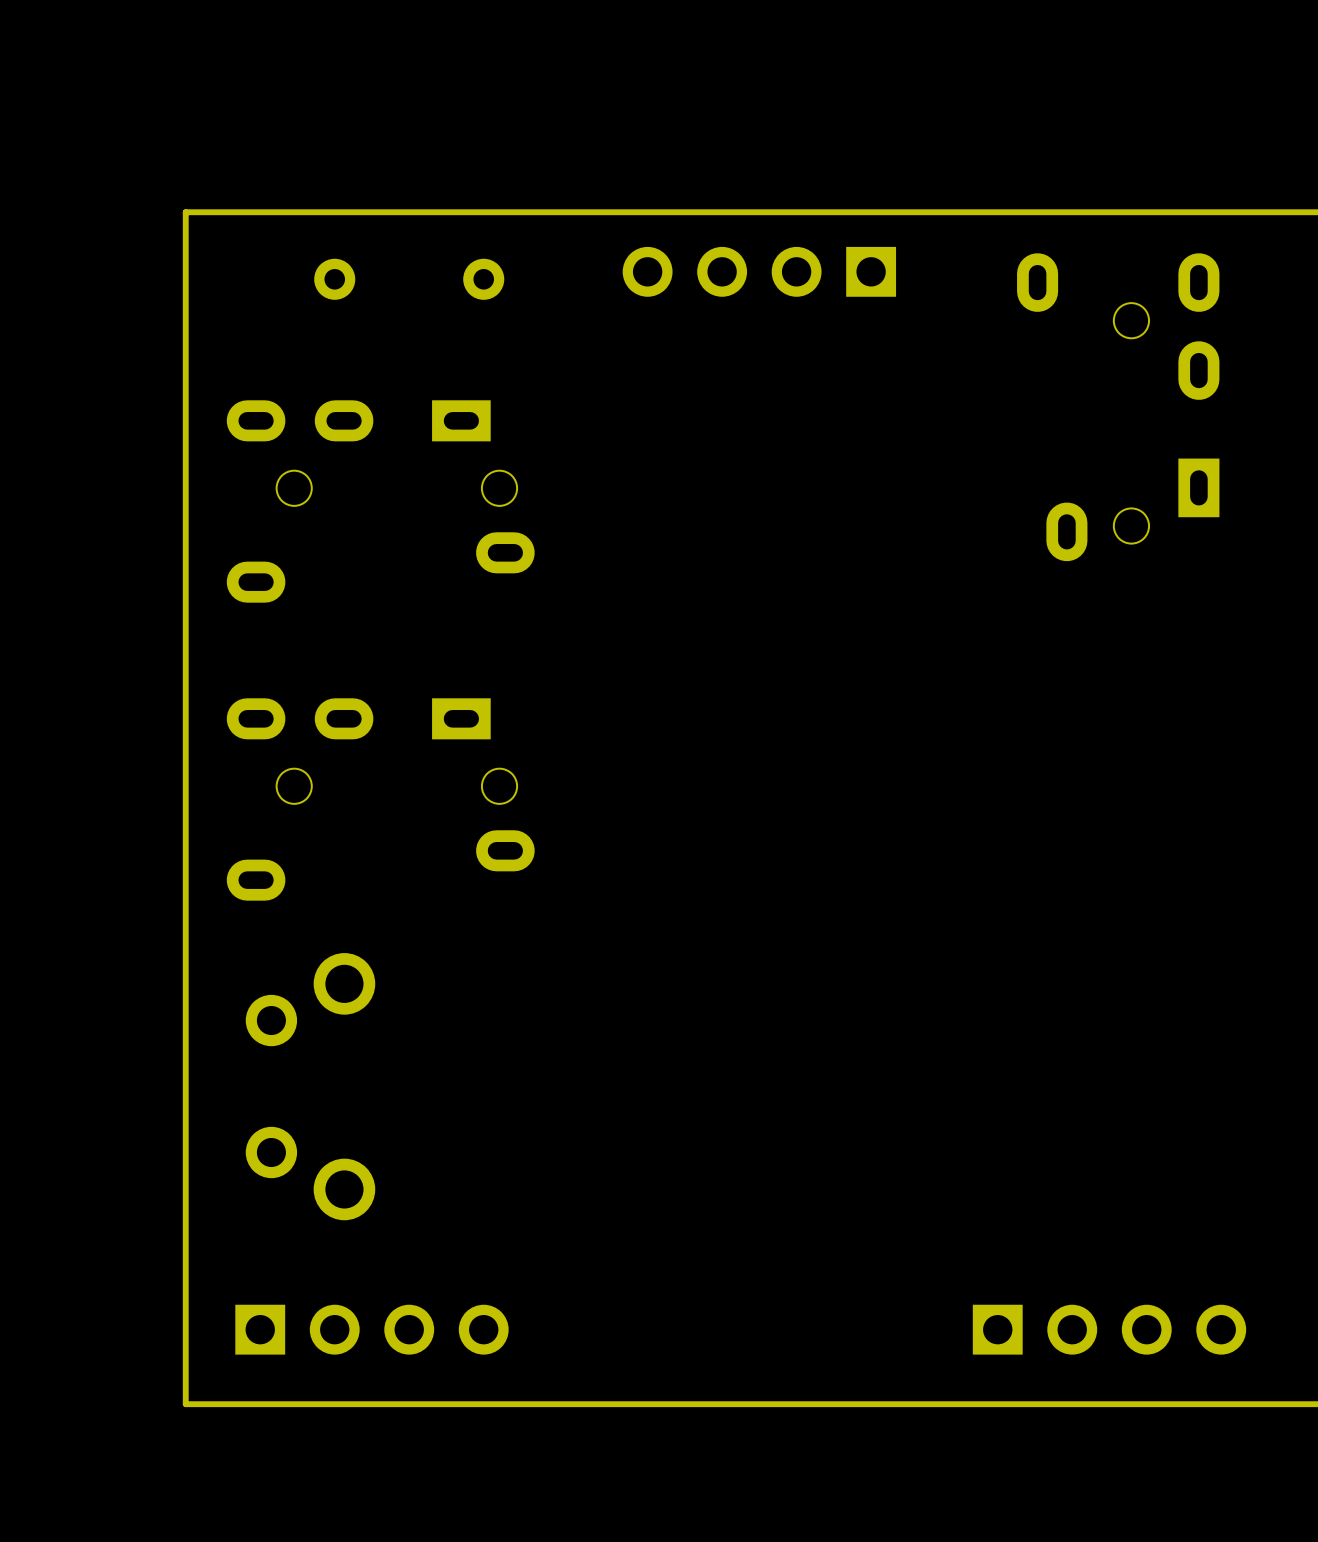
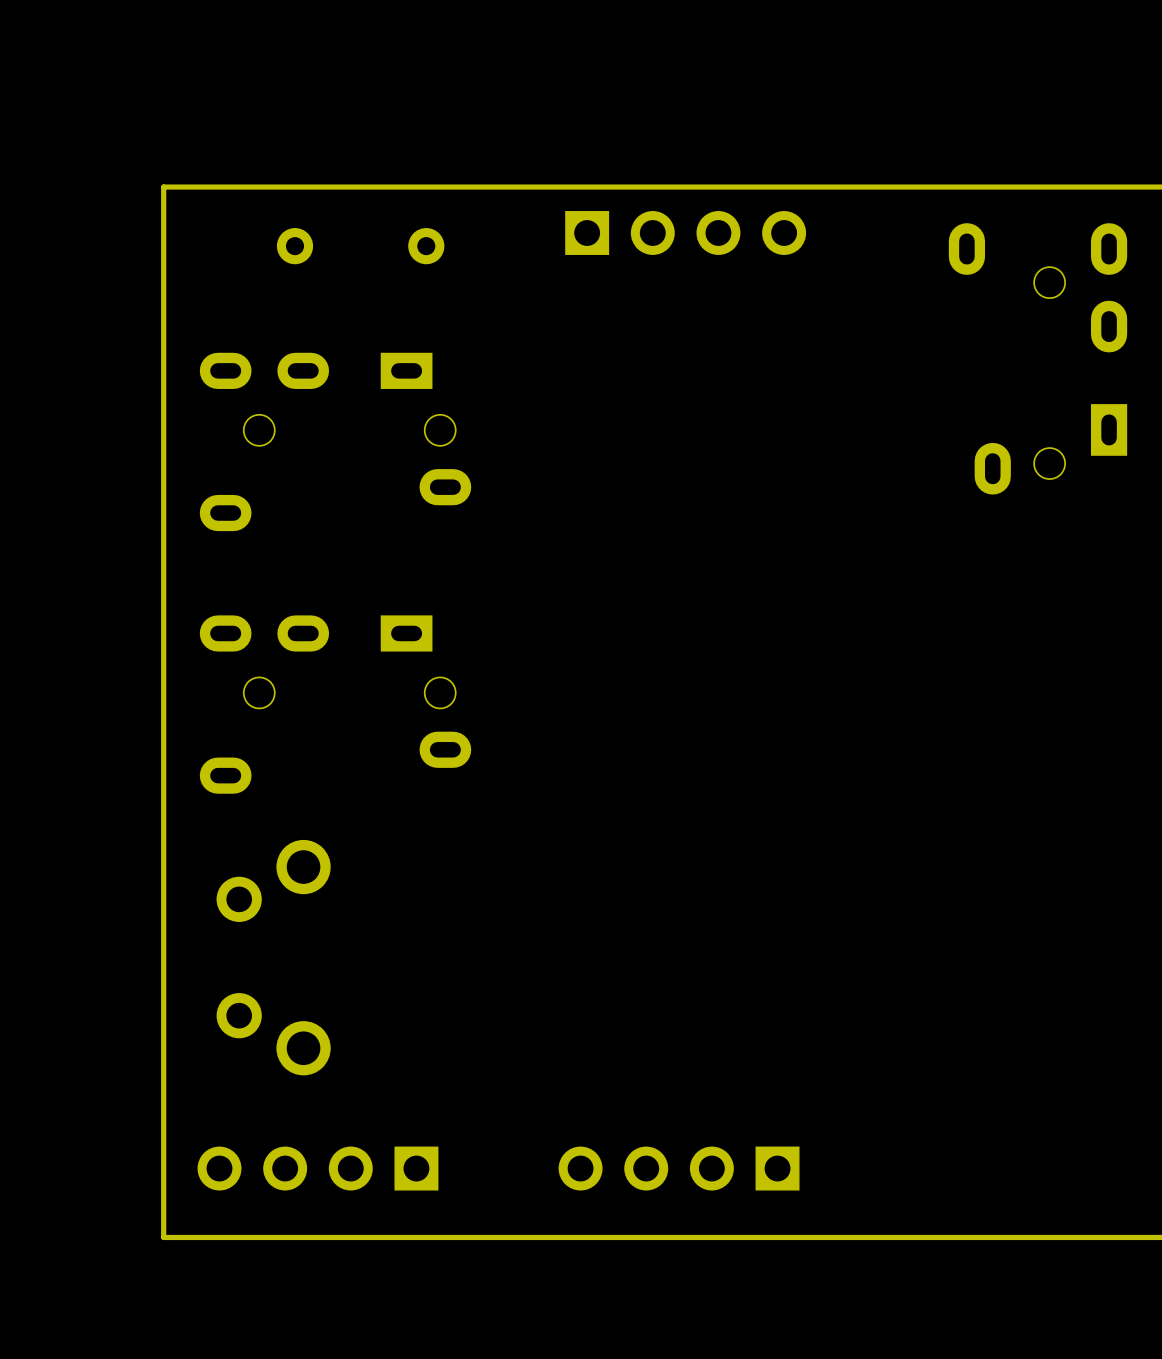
part rotation: 0° (759, 271) -> 180° (685, 233)
part position: (1118, 407) -> (1038, 358)
part rotation: 0° (371, 1329) -> 180° (317, 1168)
part rotation: 0° (1109, 1329) -> 180° (679, 1168)
part position: (1109, 1329) -> (679, 1168)

